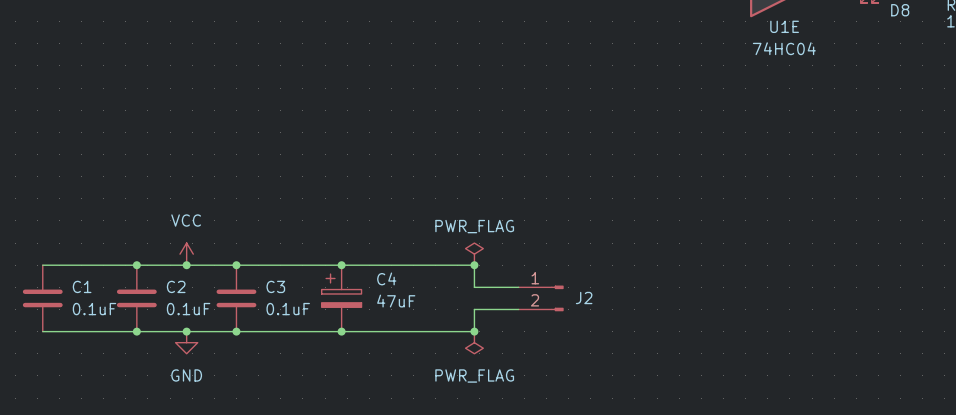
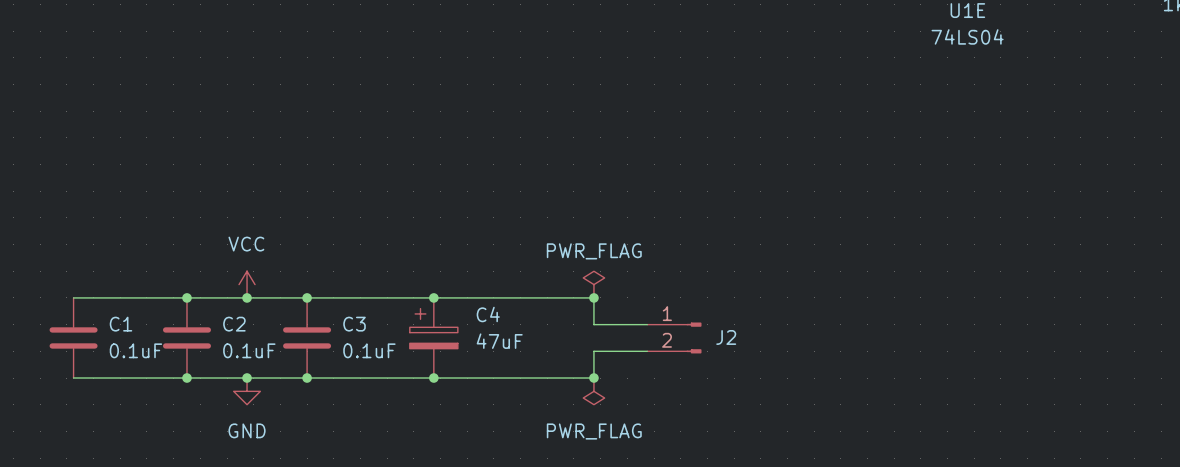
U1E value: 74HC04 (784, 48) -> 74LS04 (967, 36)

